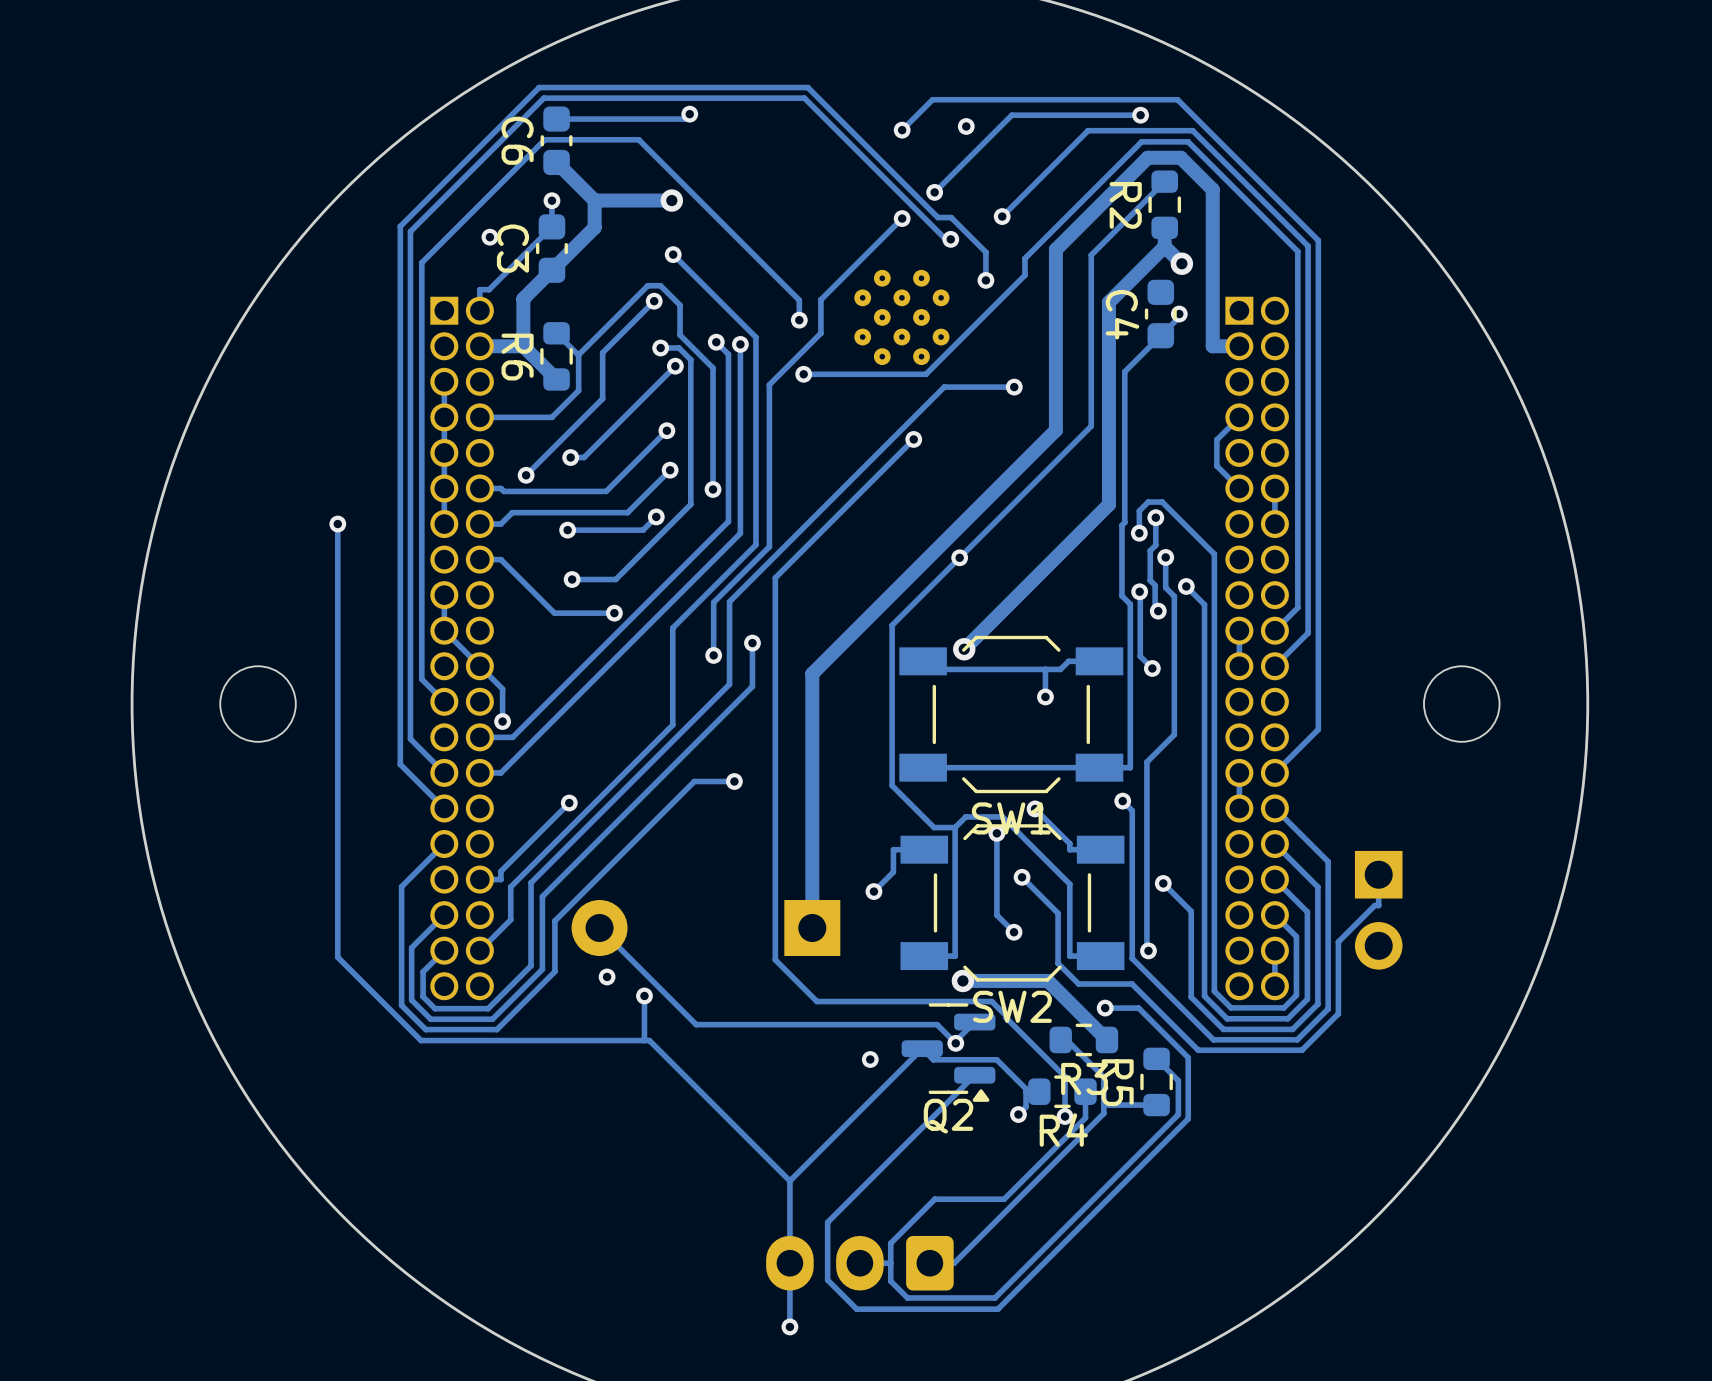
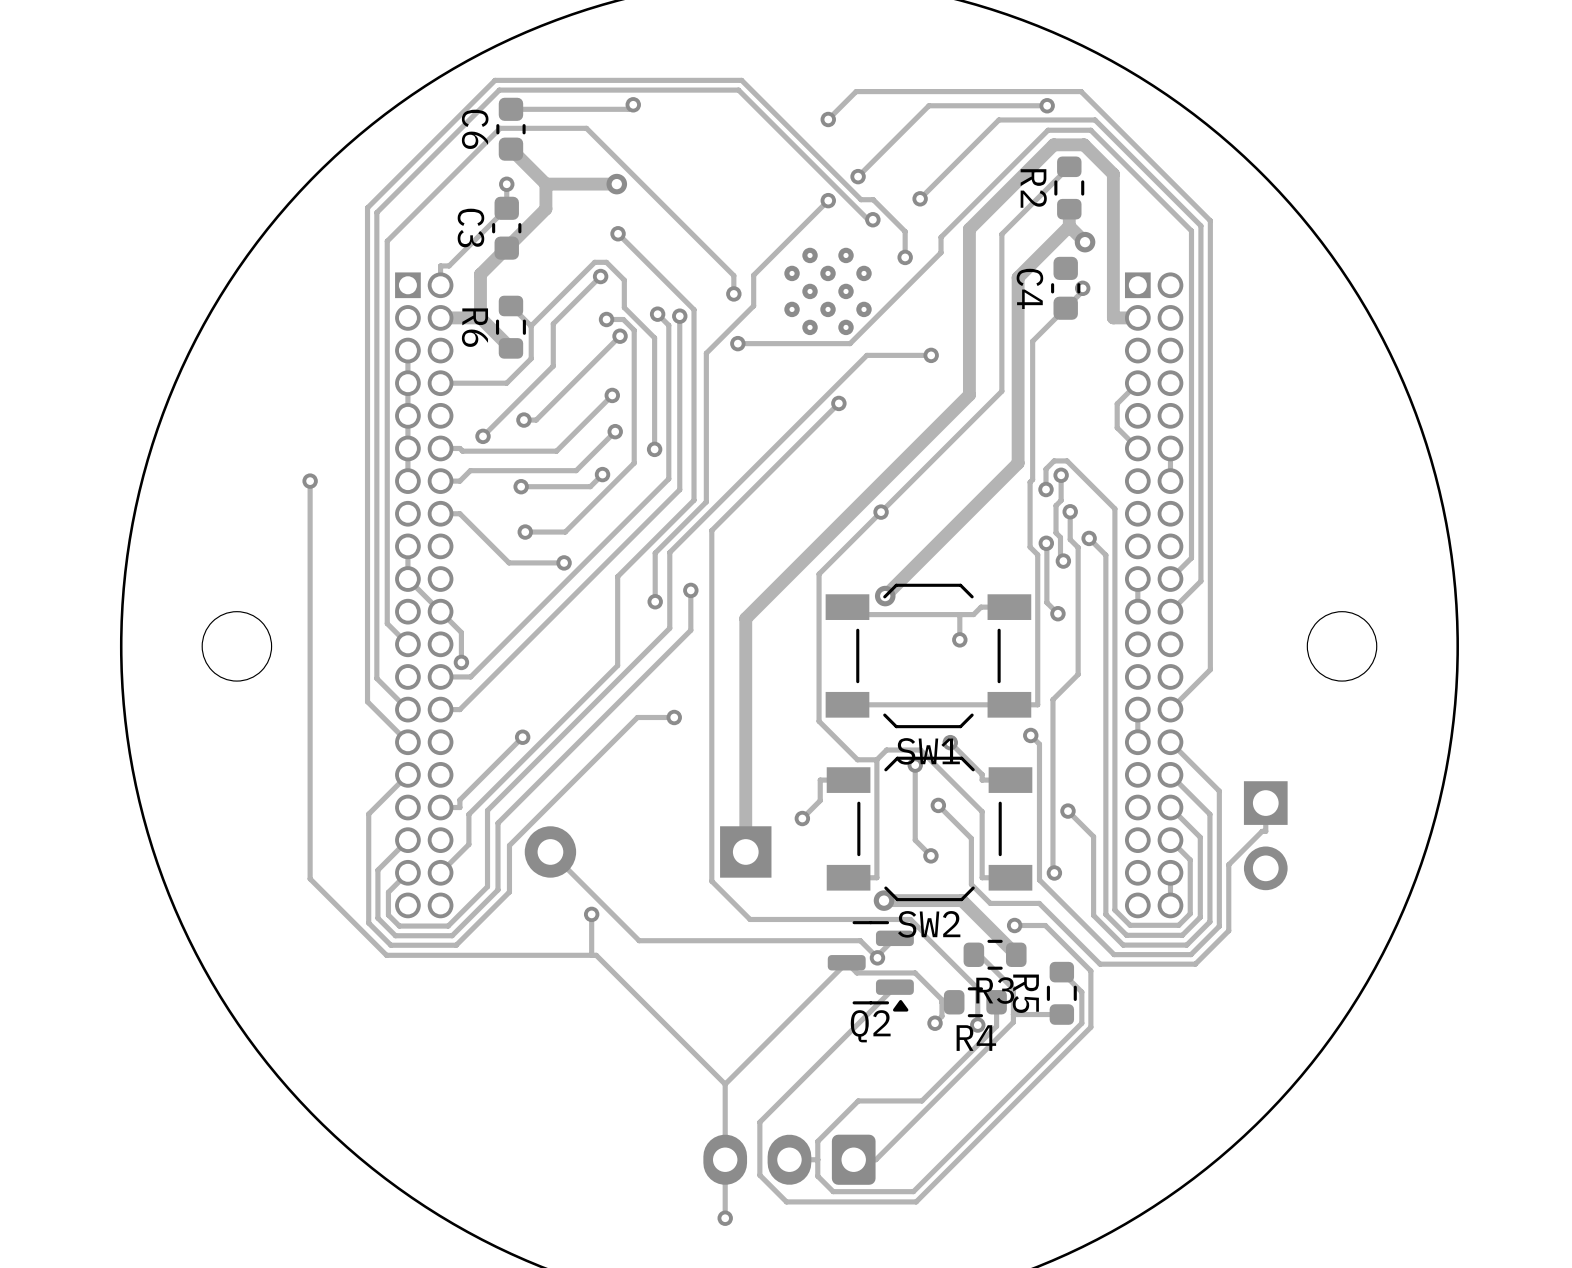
via: (966, 126) -> none
via: (489, 237) -> none
via: (607, 976) -> none
via: (870, 1059) -> none

